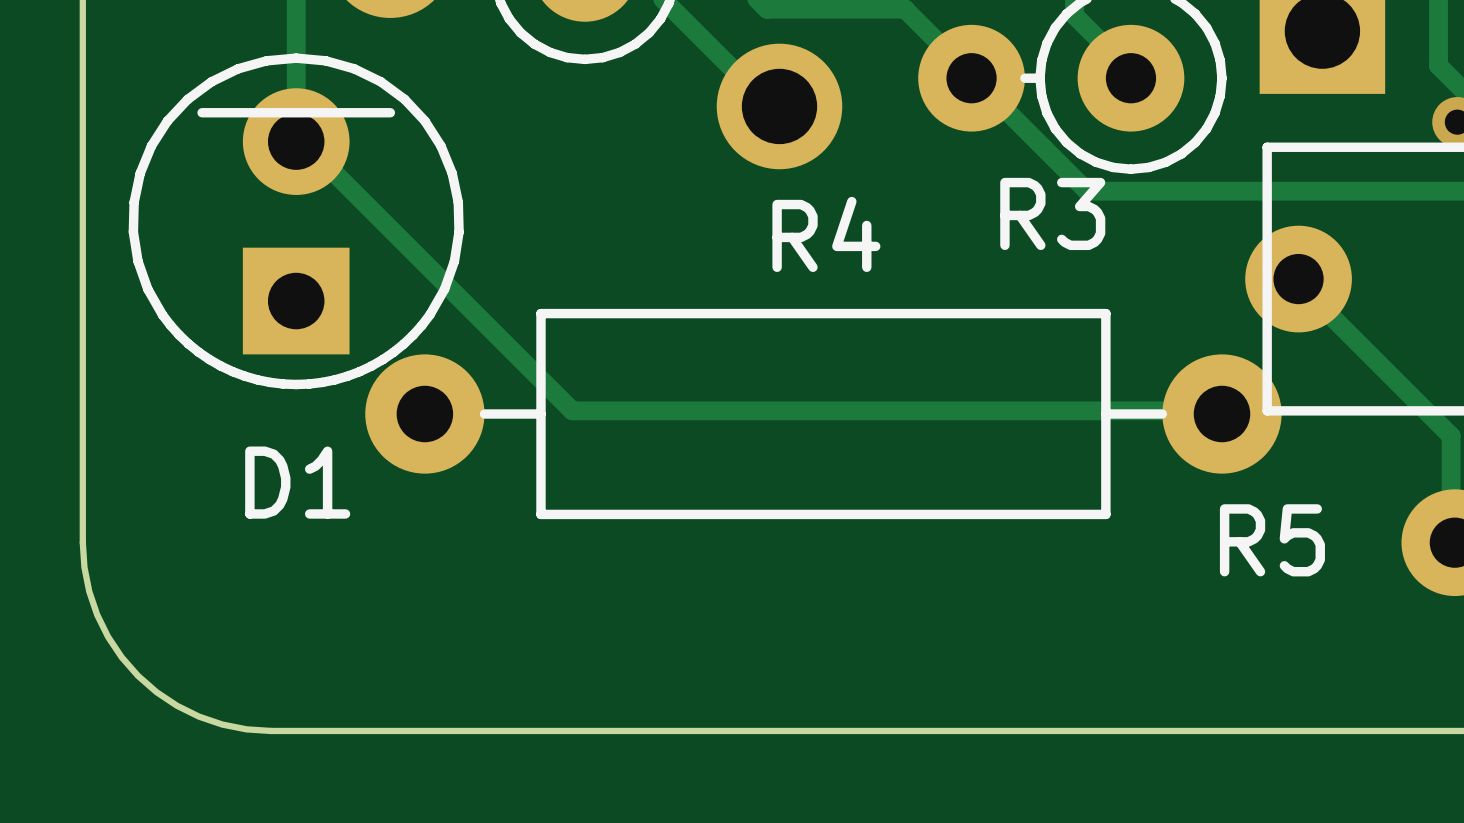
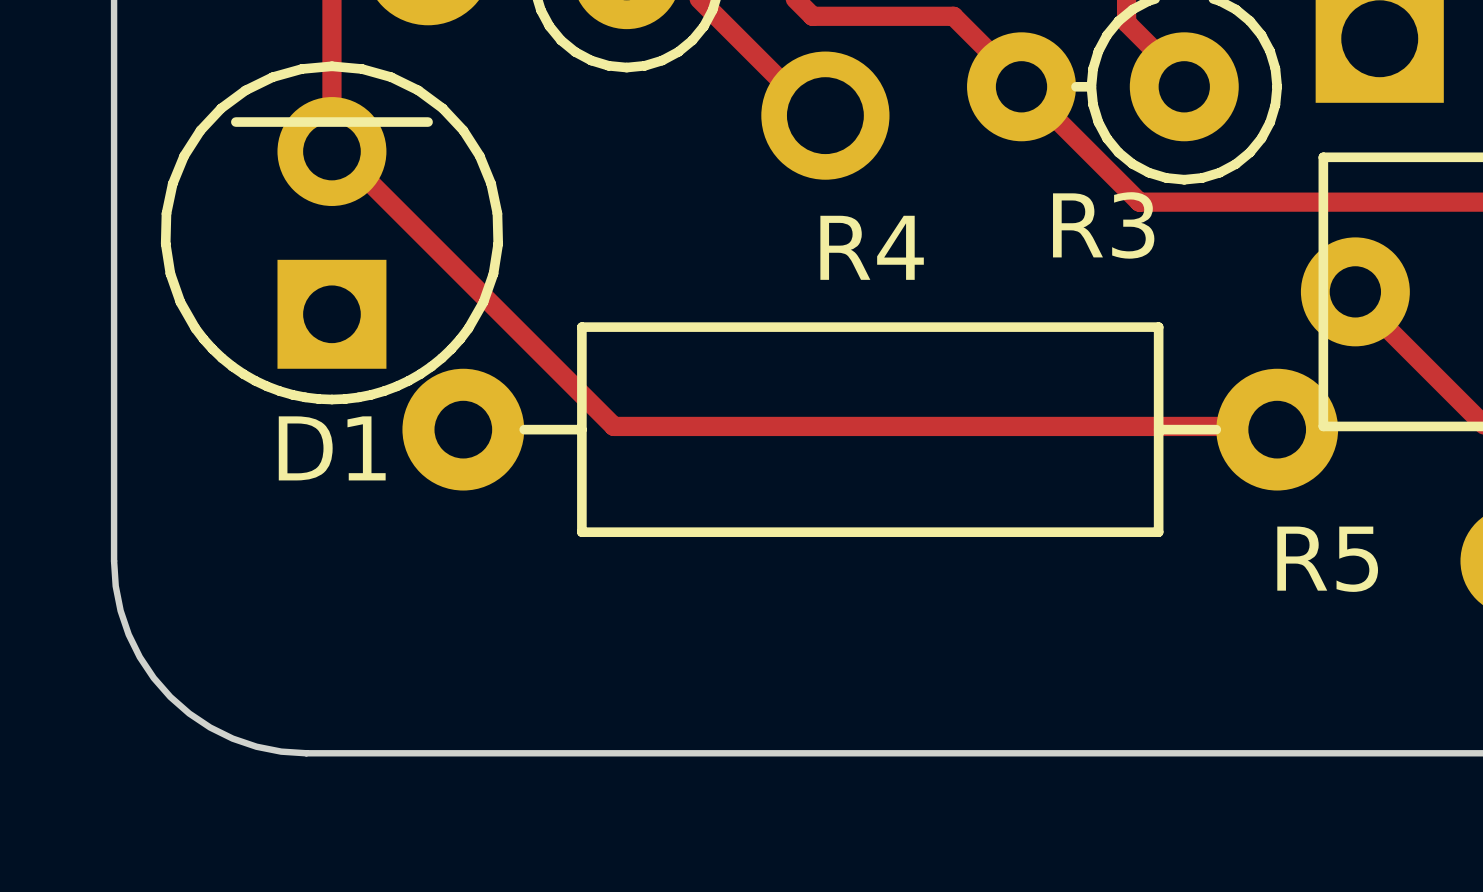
D1 name position: D1 (297, 482) -> D1 (332, 448)

